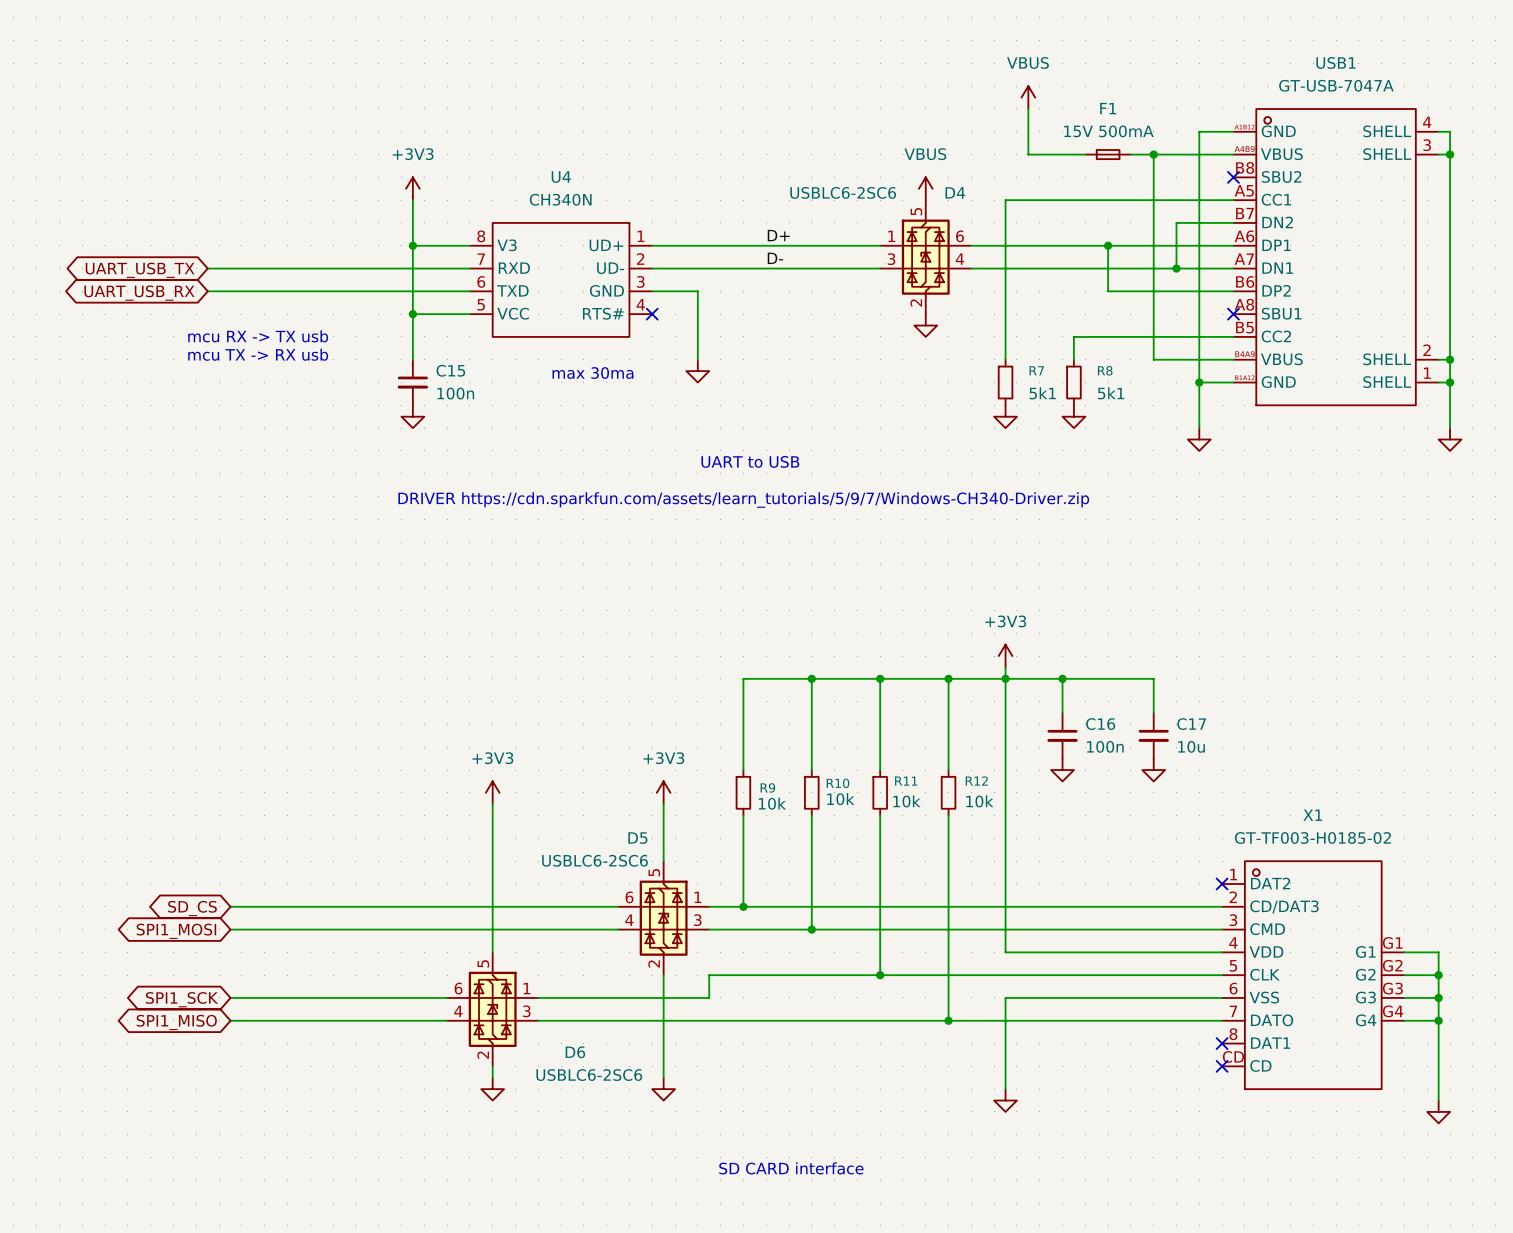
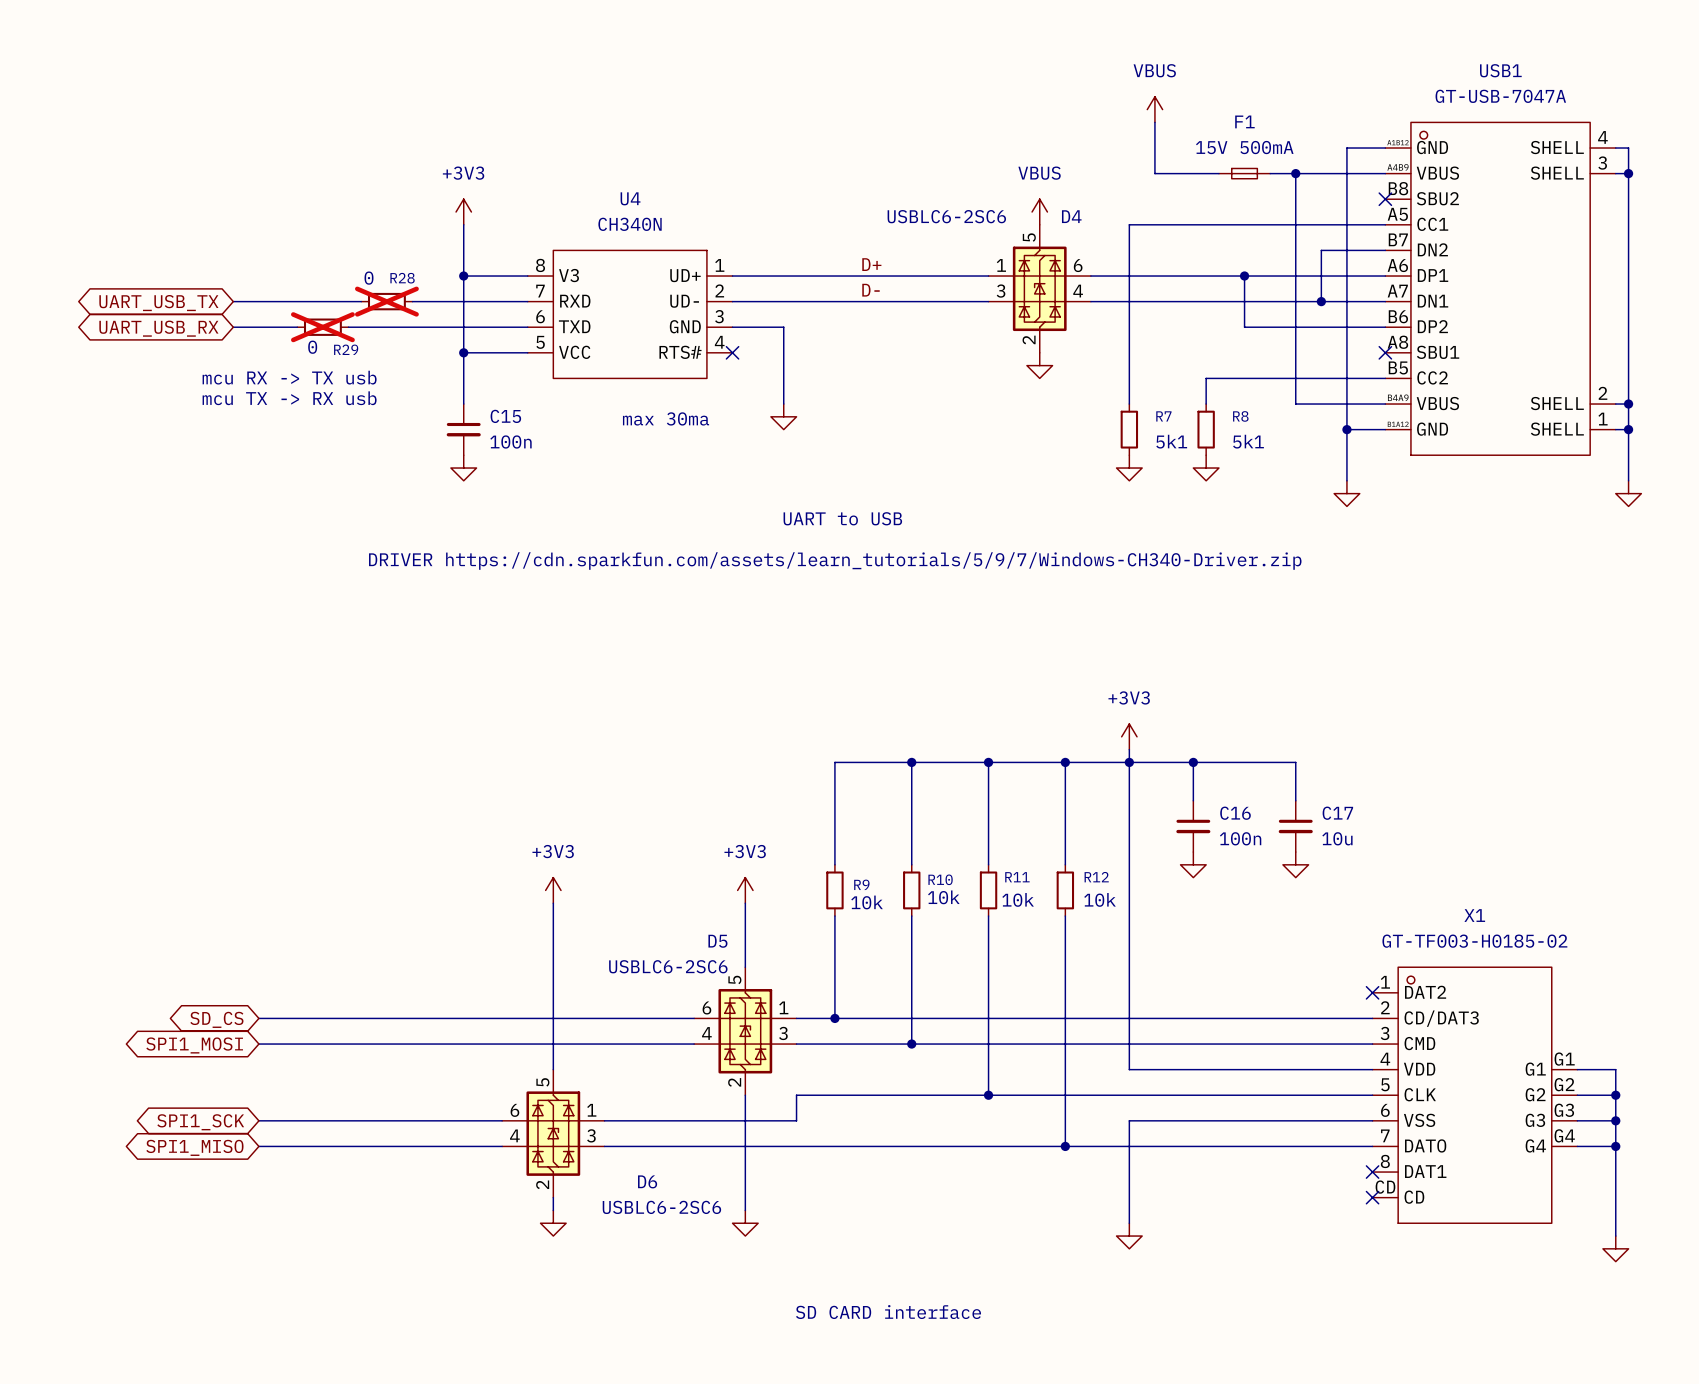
R28: none -> 0 (386, 301)
R29: none -> 0 (322, 327)

